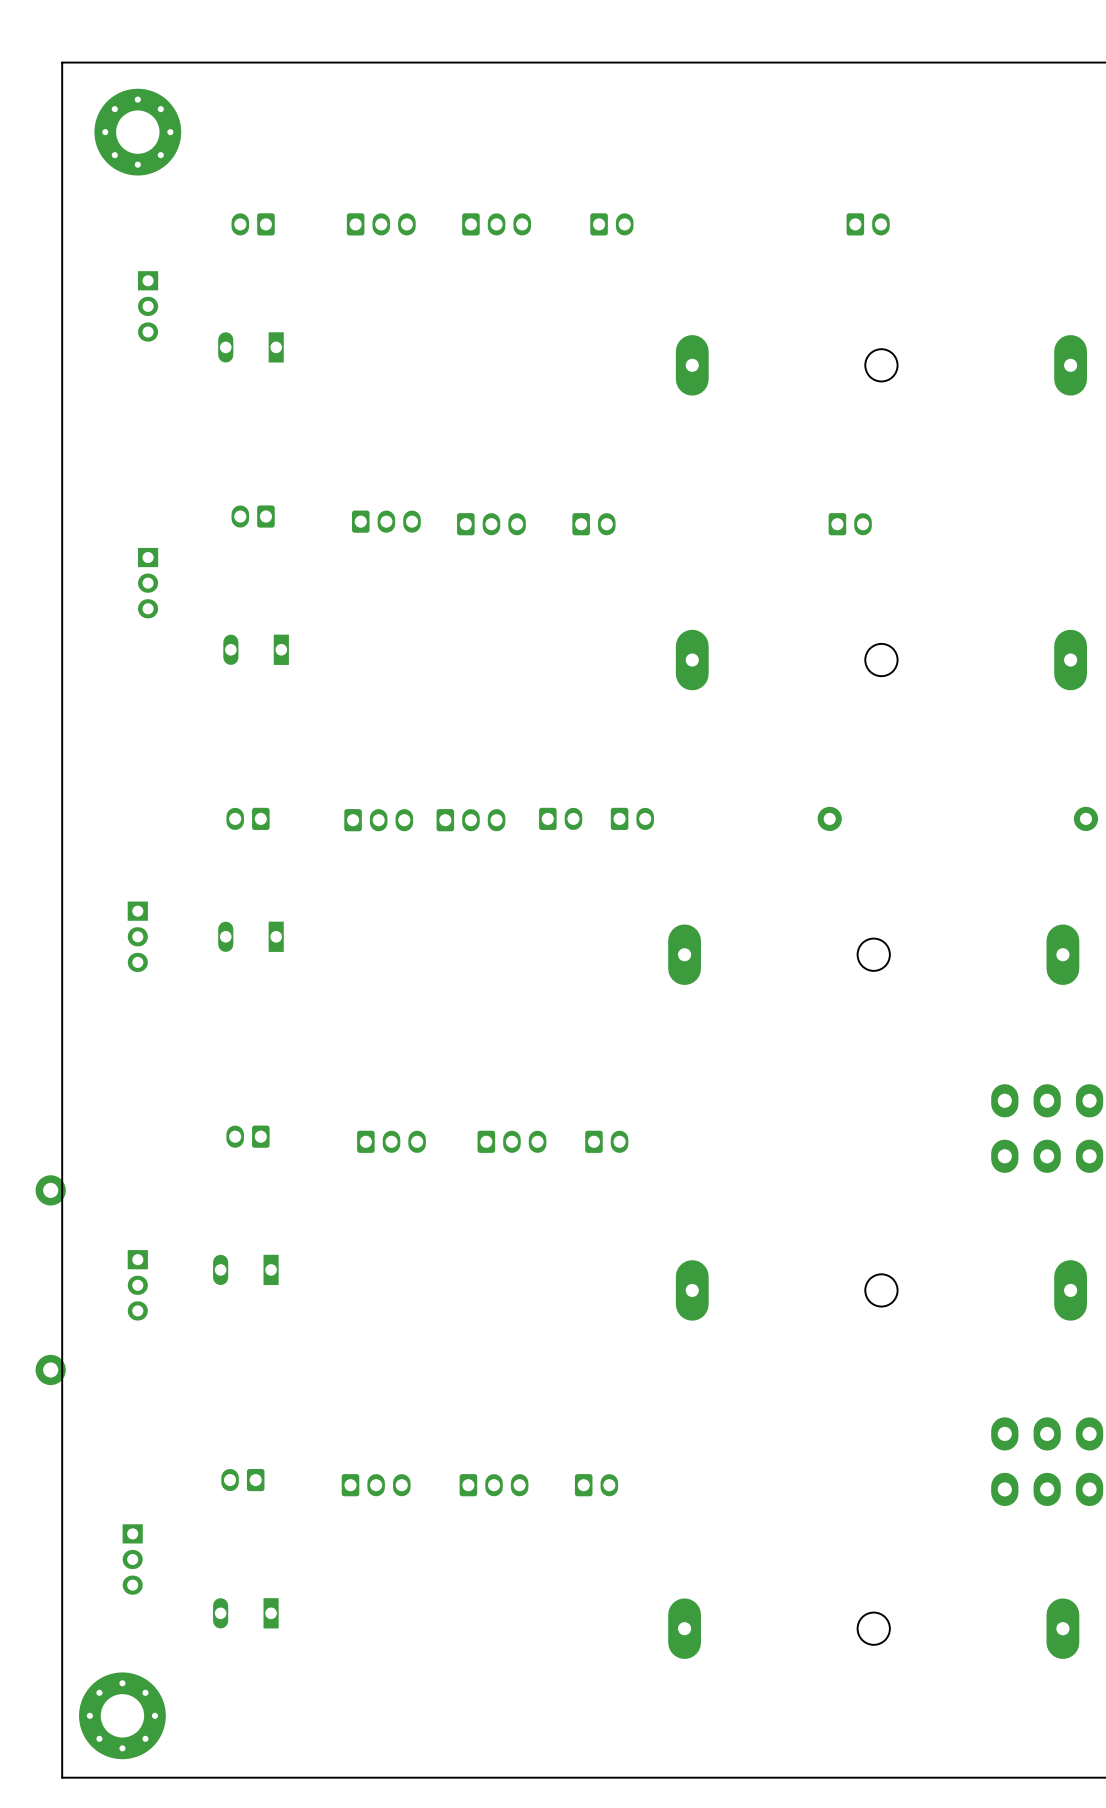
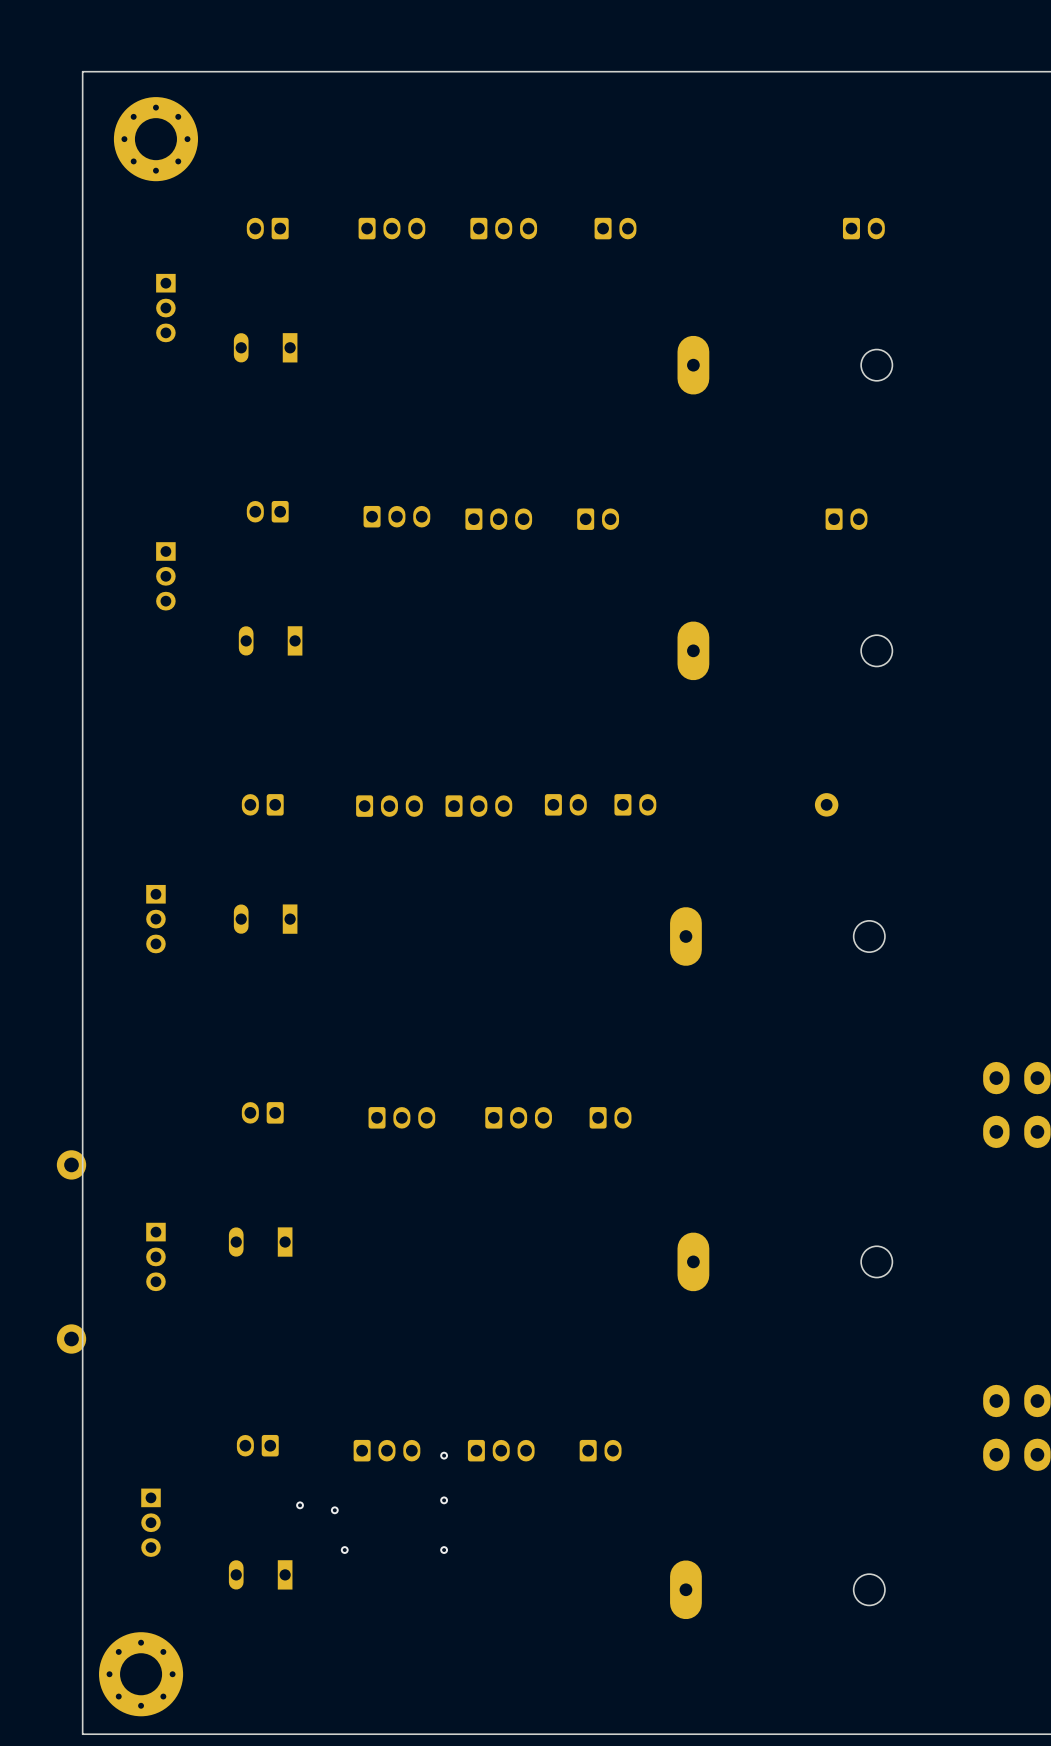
via: none -> (444, 1455)
via: none -> (444, 1500)
via: none -> (300, 1505)
via: none -> (334, 1510)
via: none -> (344, 1550)
via: none -> (444, 1550)

